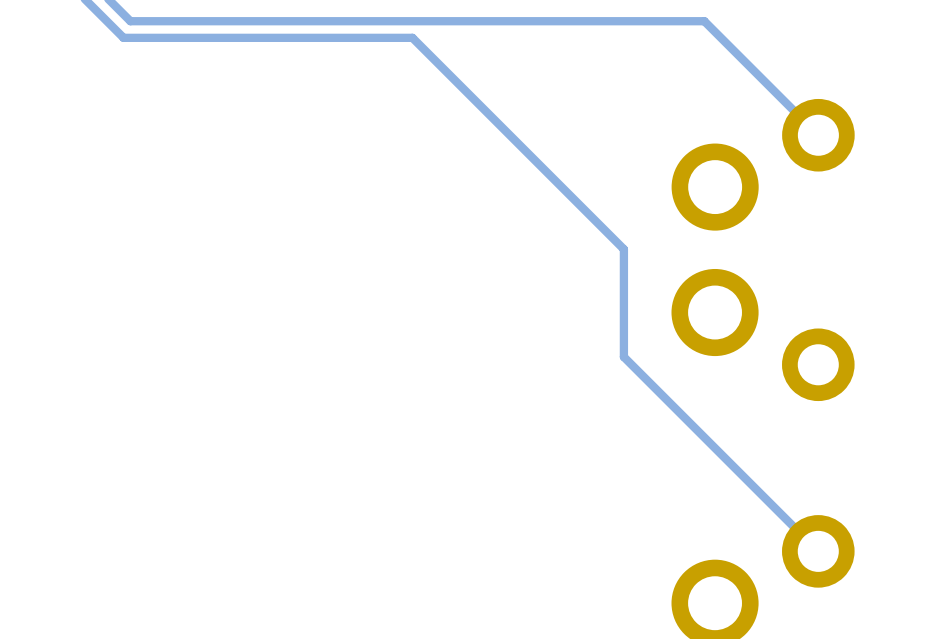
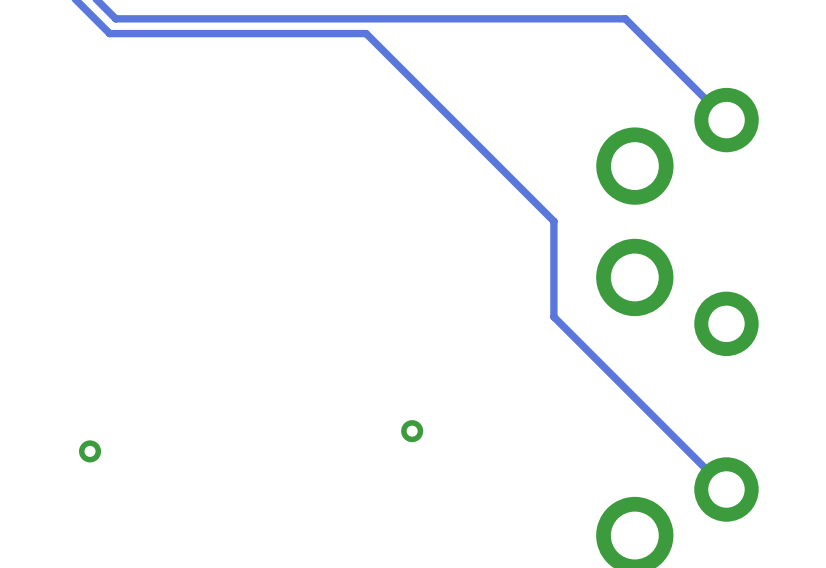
via: none -> (412, 431)
via: none -> (90, 451)

